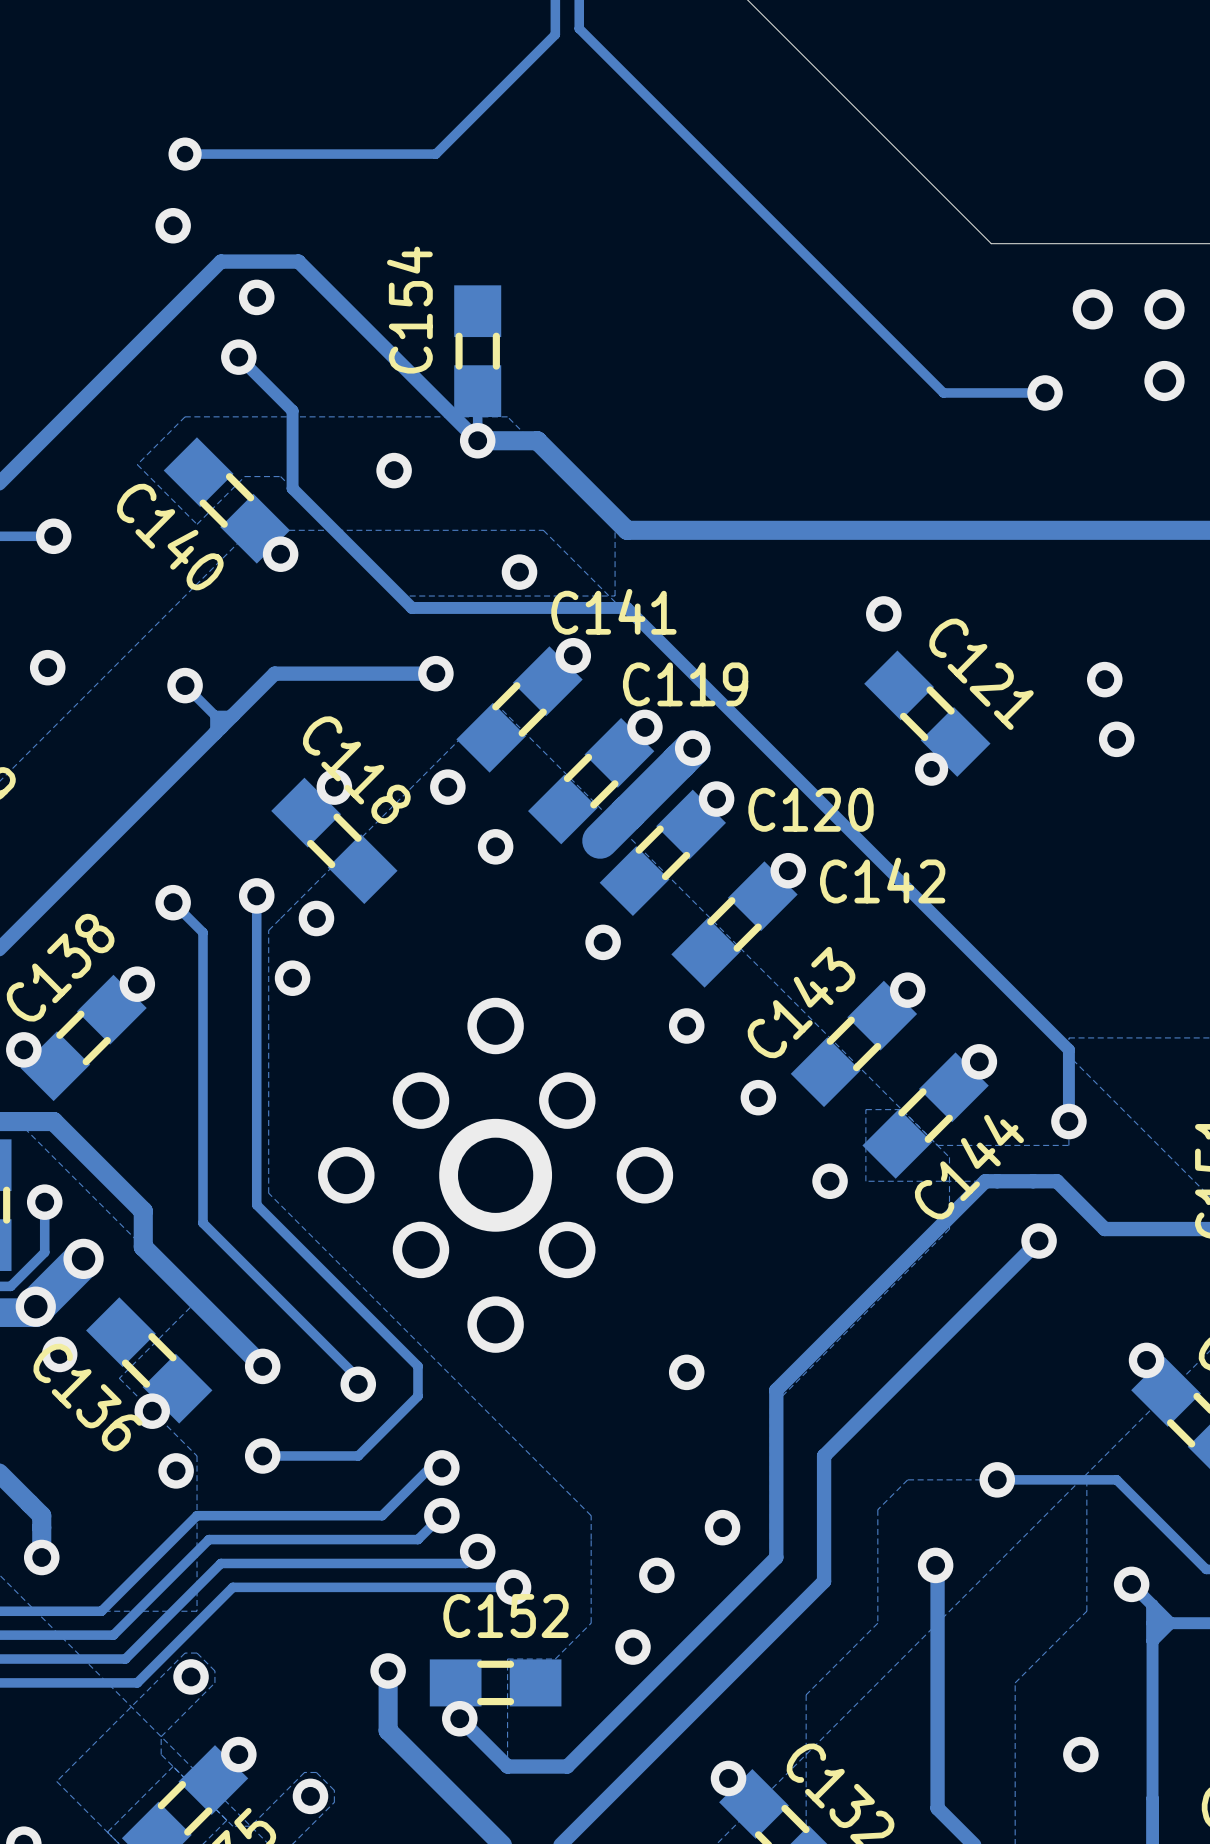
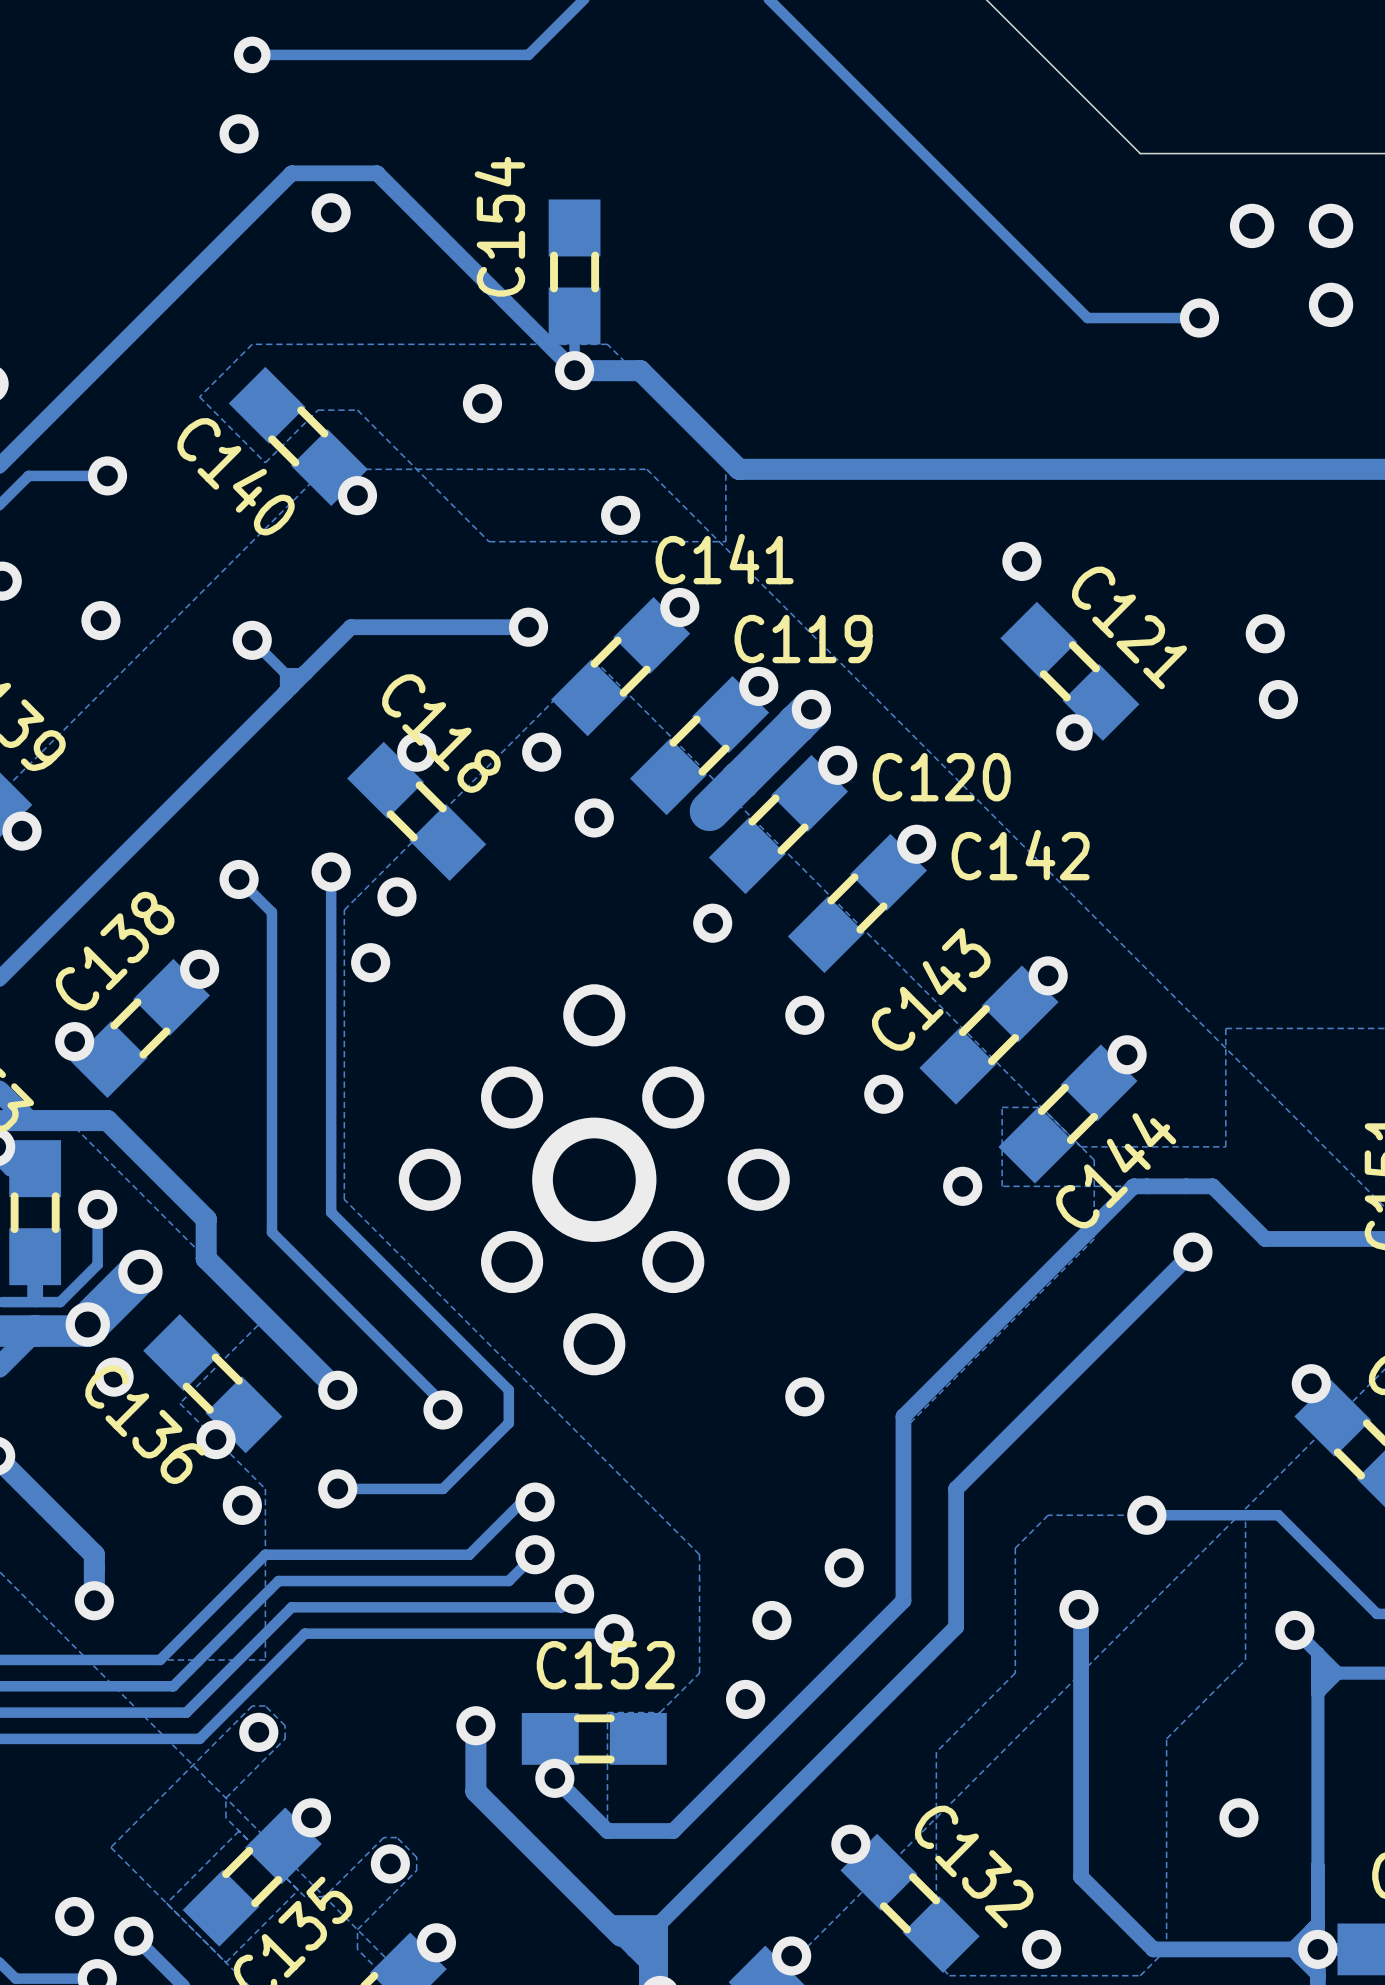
track: (238, 357) (292, 410) (292, 488) (412, 607) (627, 607) (1068, 1049) (1068, 1121) -> none
via: (238, 357) -> none
via: (1068, 1121) -> none

